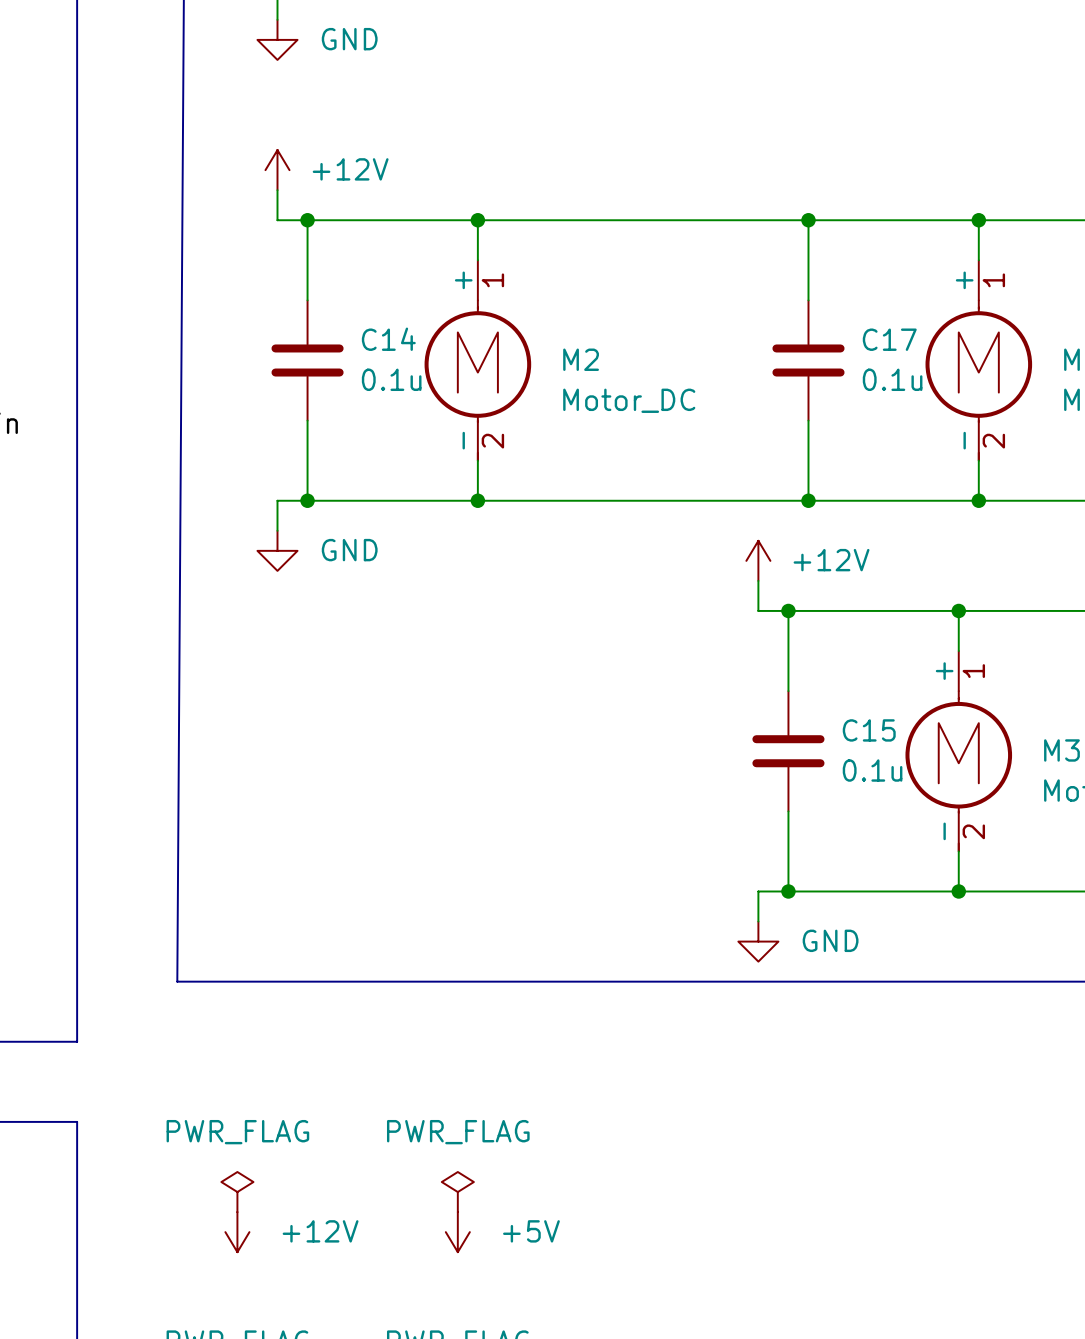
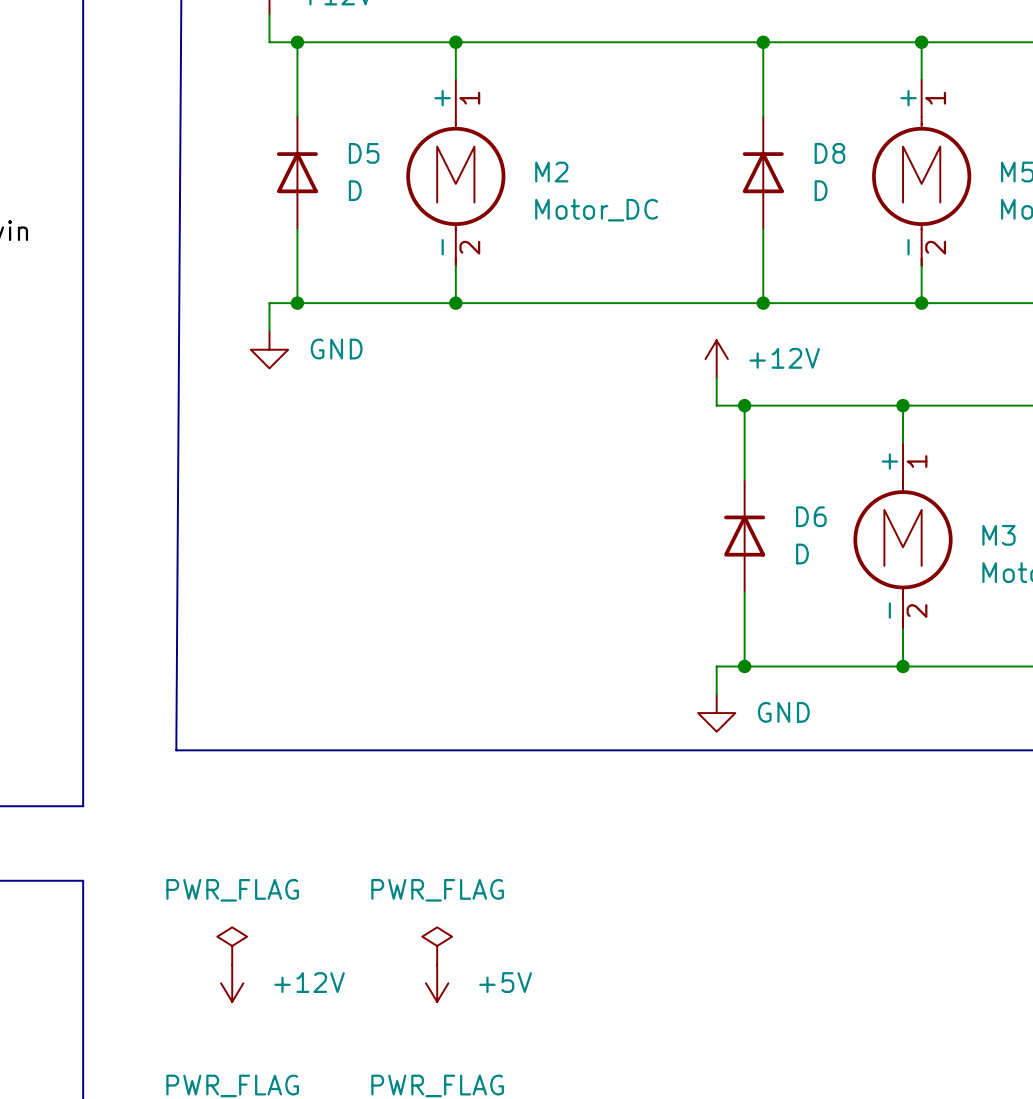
C14: 0.1u (307, 360) -> none
D5: none -> D (297, 172)
C17: 0.1u (808, 360) -> none
D8: none -> D (763, 172)
C15: 0.1u (788, 751) -> none
D6: none -> D (744, 536)

